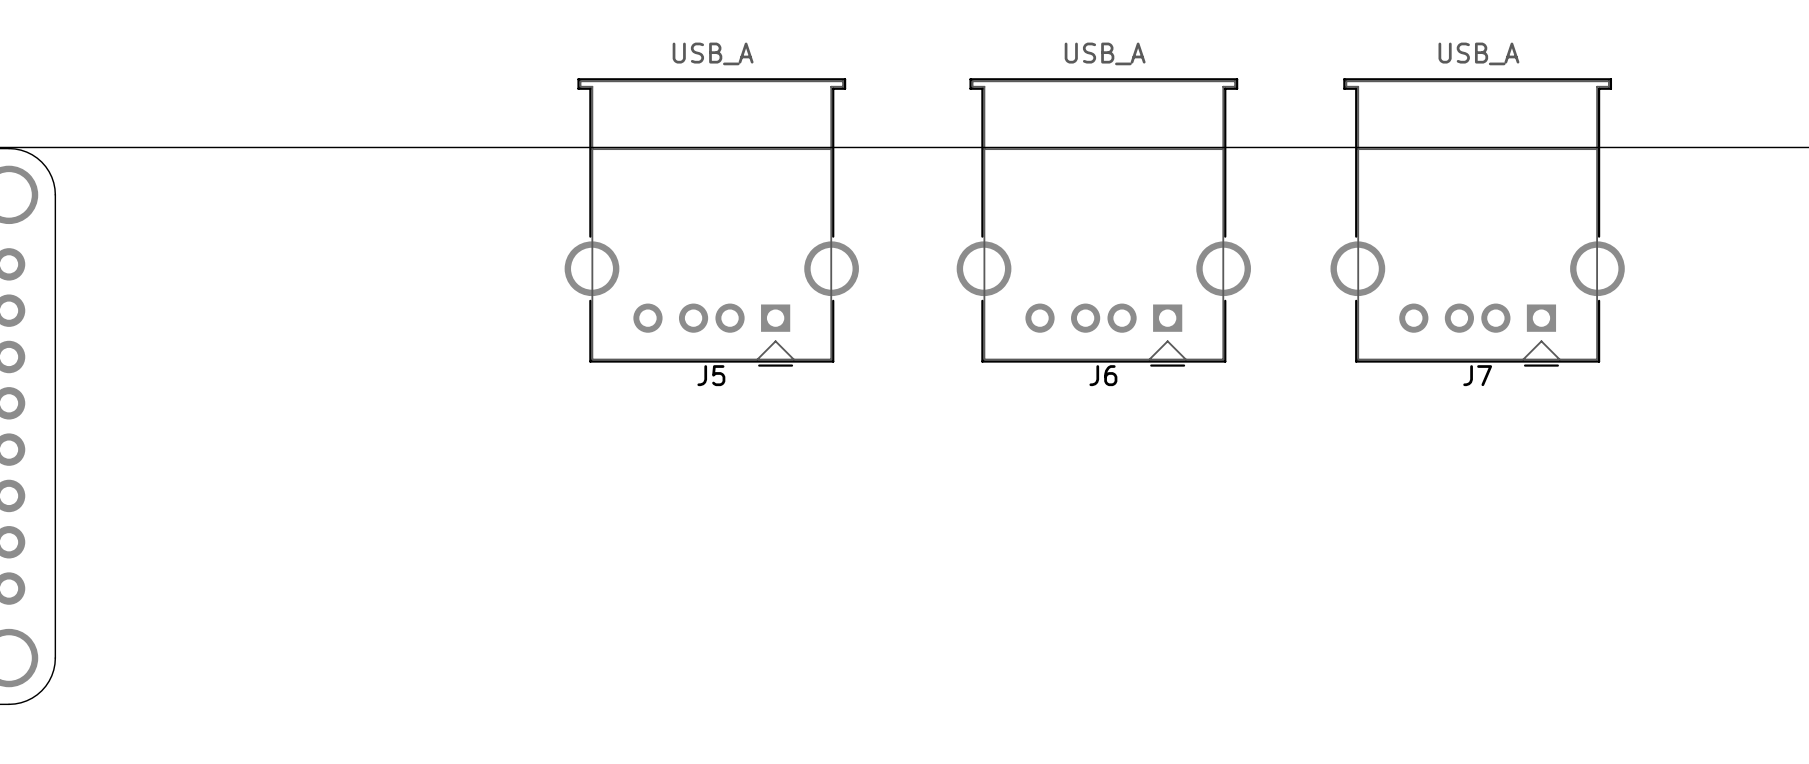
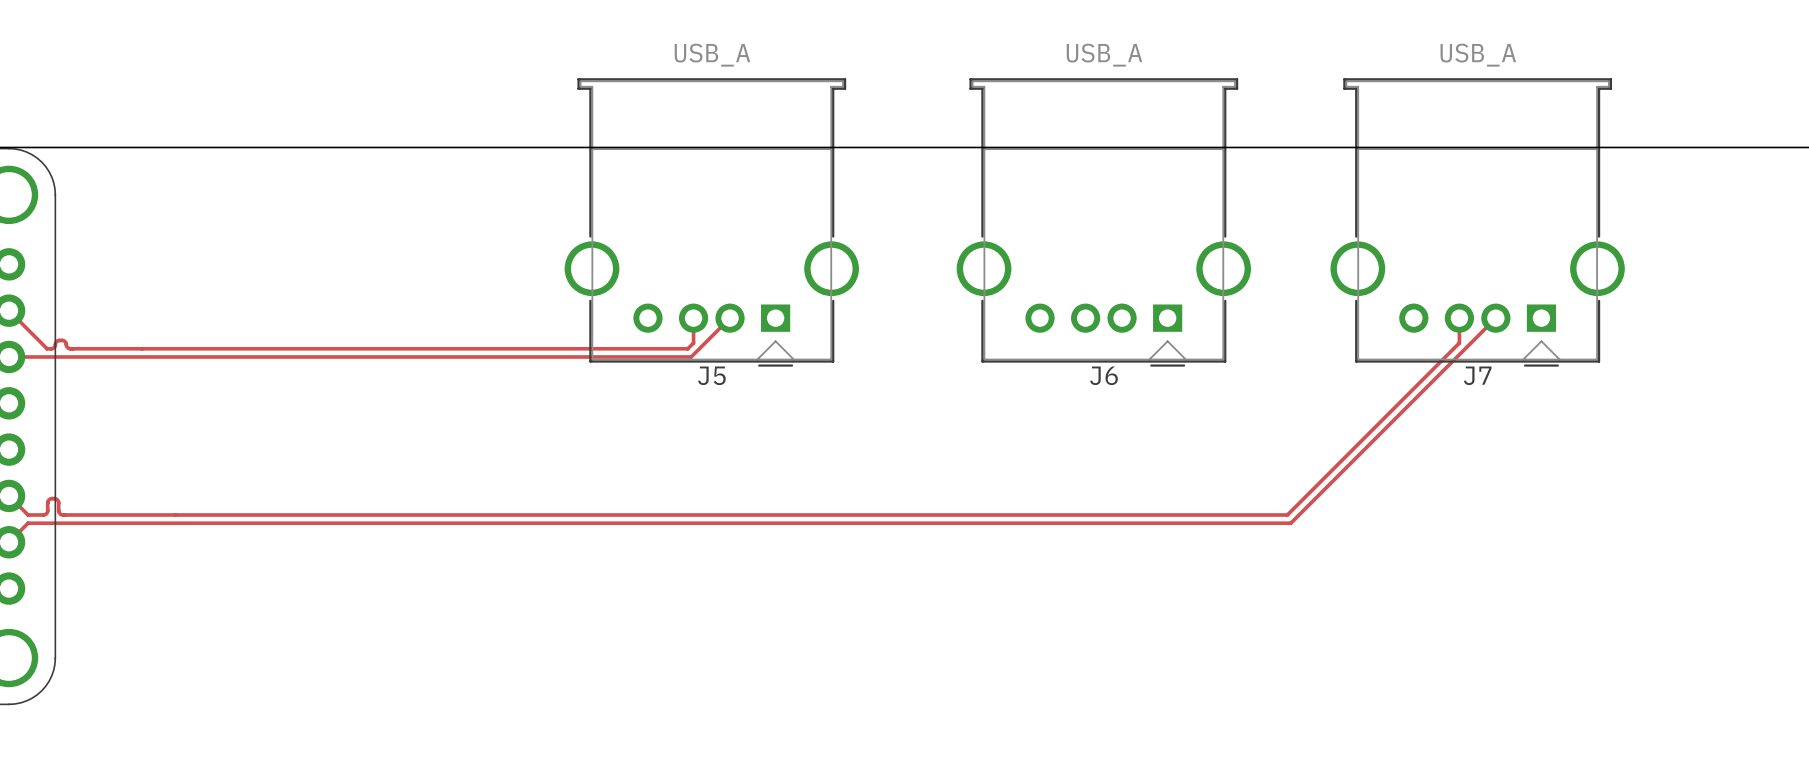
track: none -> (9, 310) (47, 348) (53, 348) (56, 342) (59, 340) (64, 341) (67, 347) (70, 348) (687, 348) (693, 343) (693, 318)
track: none -> (730, 318) (691, 356) (9, 356)
track: none -> (1459, 318) (1459, 343) (1287, 514) (63, 514) (58, 512) (58, 501) (54, 498) (48, 501) (45, 514) (28, 514) (9, 495)
track: none -> (1495, 318) (1290, 523) (28, 523) (9, 542)

